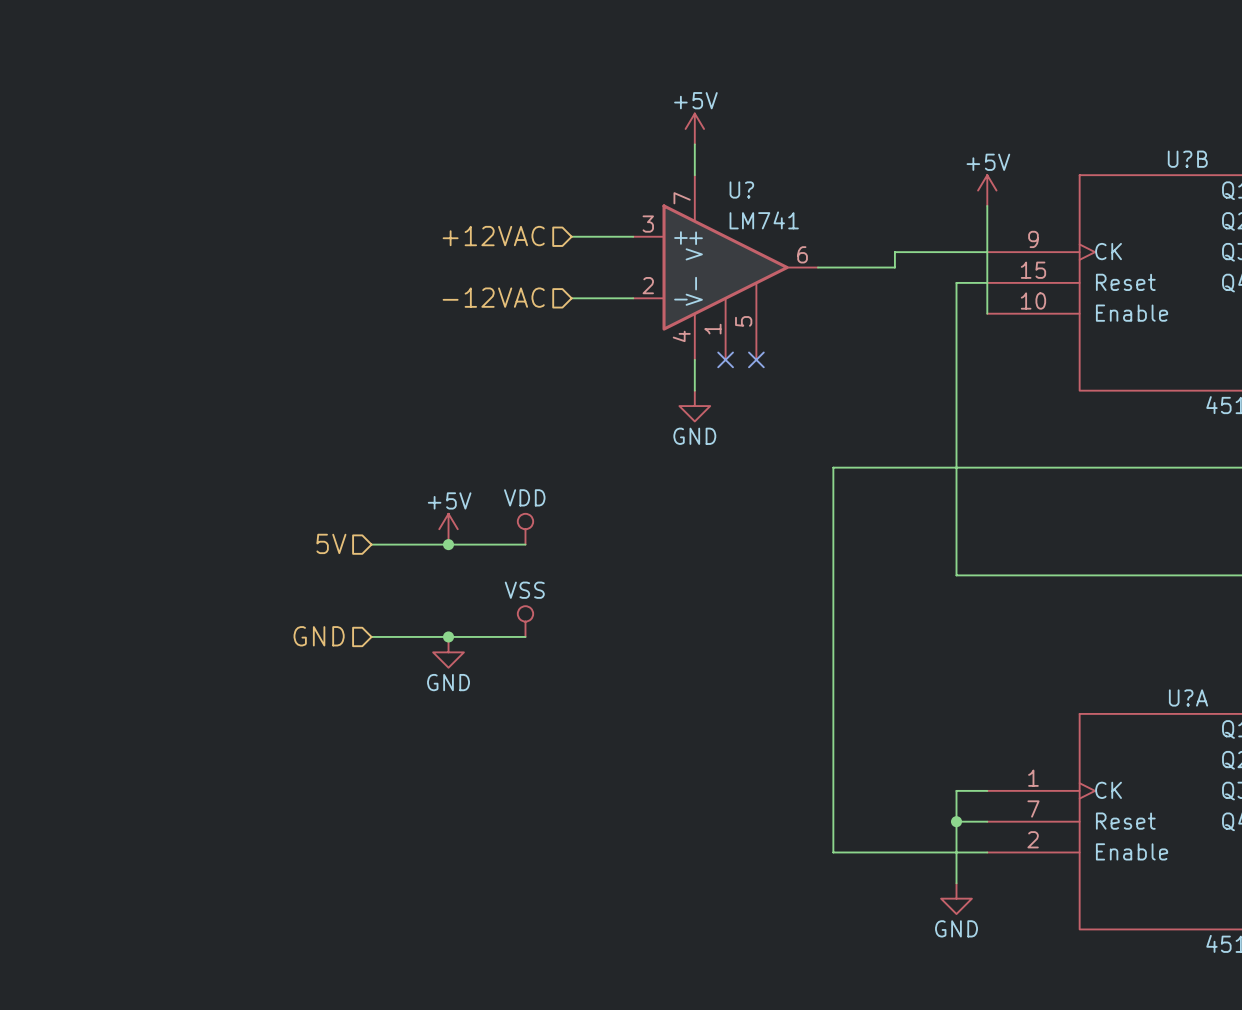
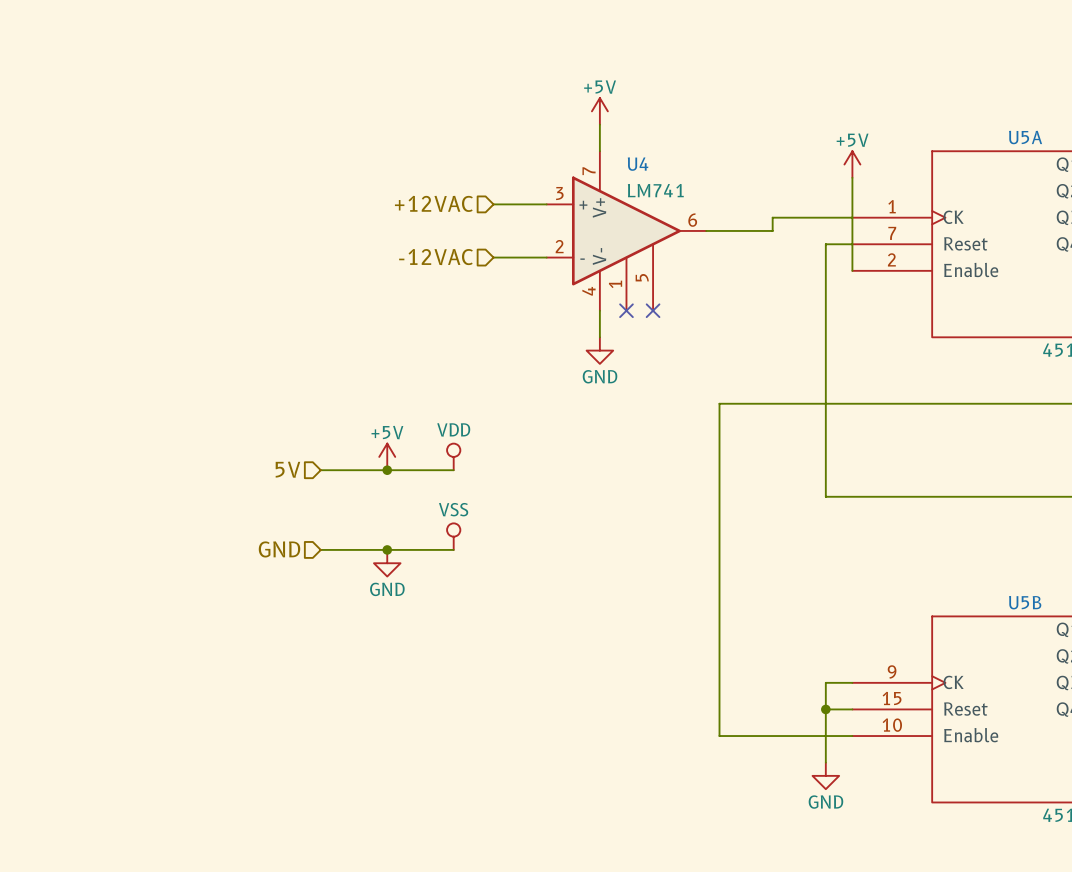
U?B name: U?B (1187, 159) -> U5A (1025, 137)
U? name: U? (741, 189) -> U4 (638, 164)
U?B pin number: 9 (1033, 239) -> 1 (892, 206)
U?B pin number: 15 (1033, 270) -> 7 (892, 233)
U?B pin number: 10 (1033, 301) -> 2 (891, 259)
U?A name: U?A (1188, 697) -> U5B (1025, 602)
U?A pin number: 1 (1033, 778) -> 9 (892, 671)
U?A pin number: 7 (1033, 808) -> 15 (892, 698)
U?A pin number: 2 (1033, 839) -> 10 (892, 725)

